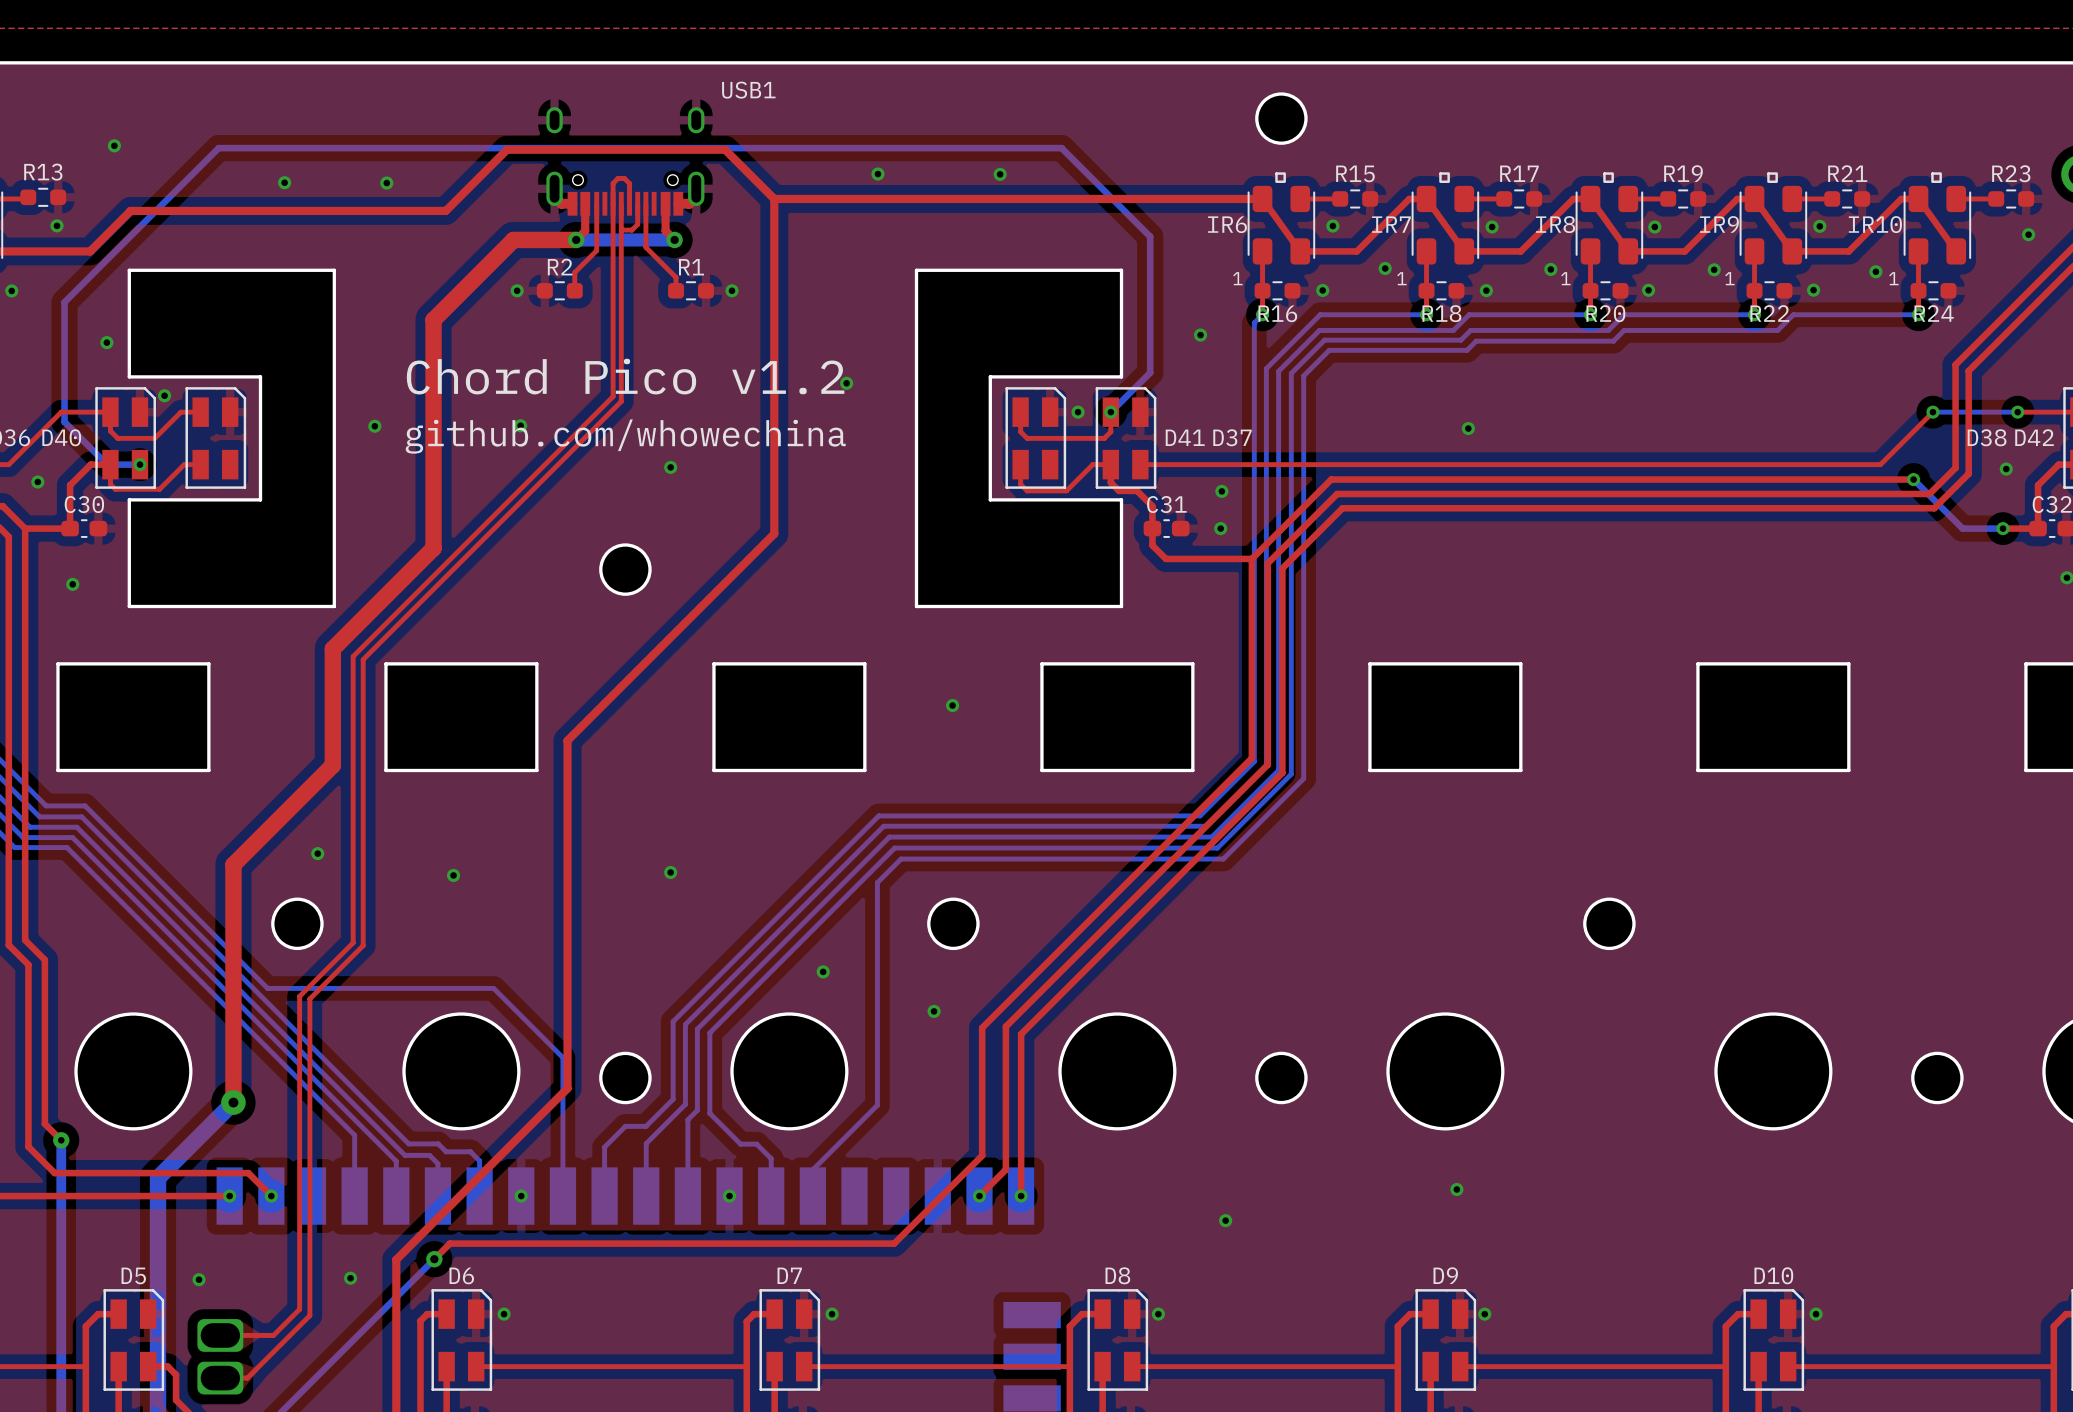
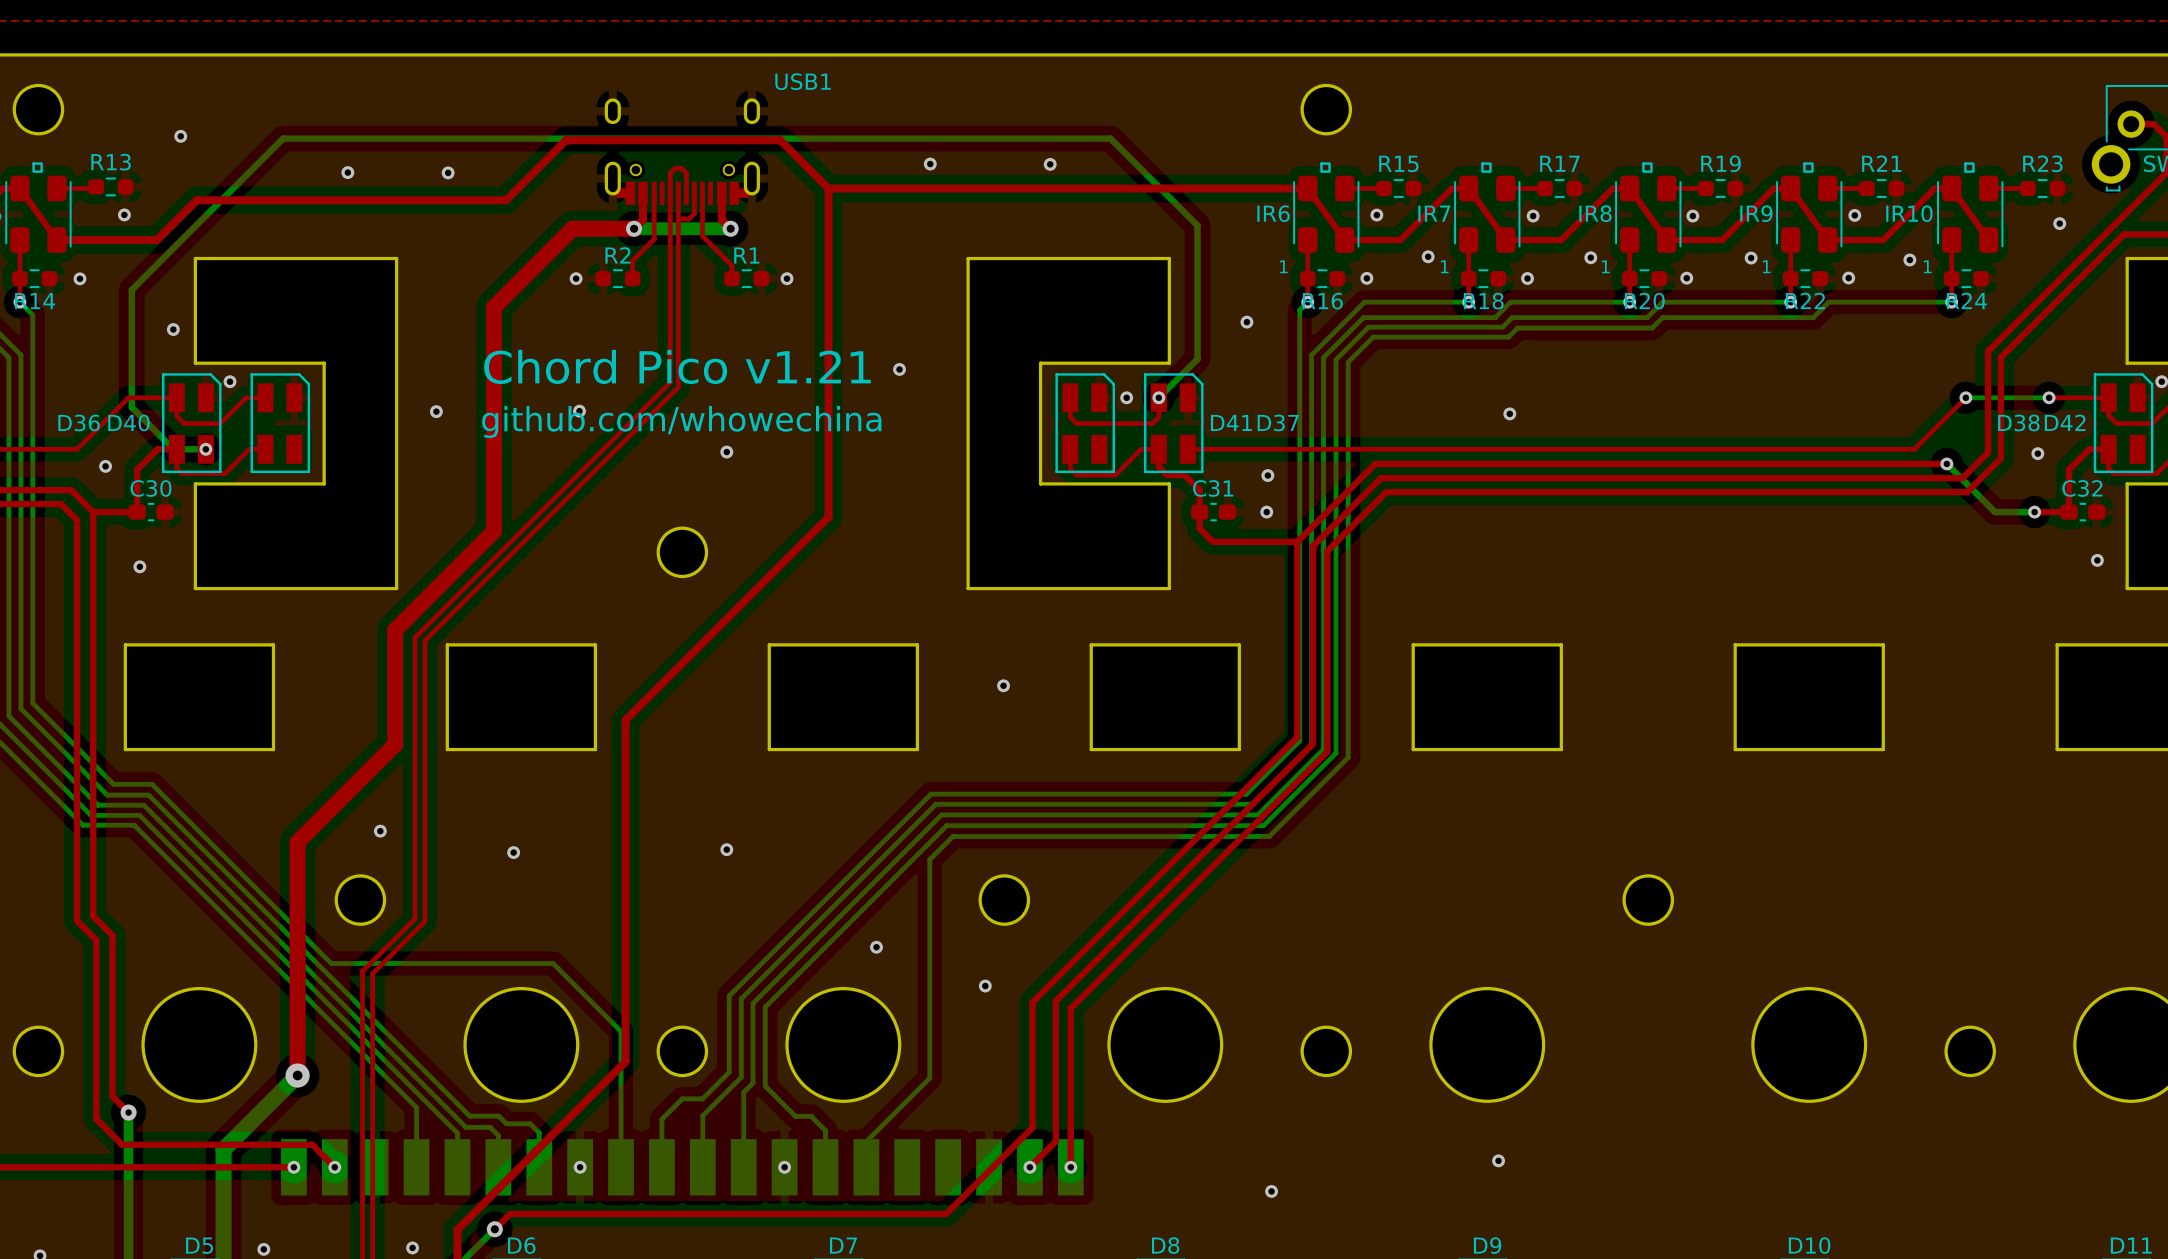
text: Chord Pico v1.2 (625, 376) -> Chord Pico v1.21 (677, 366)

